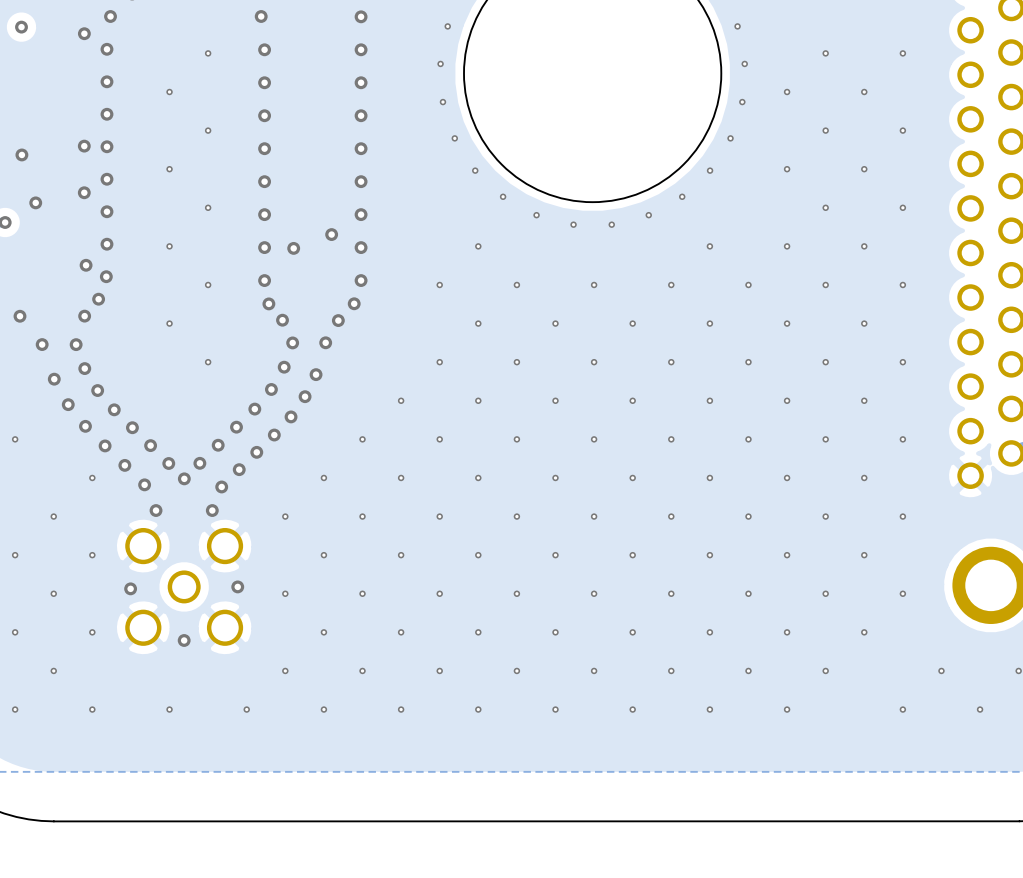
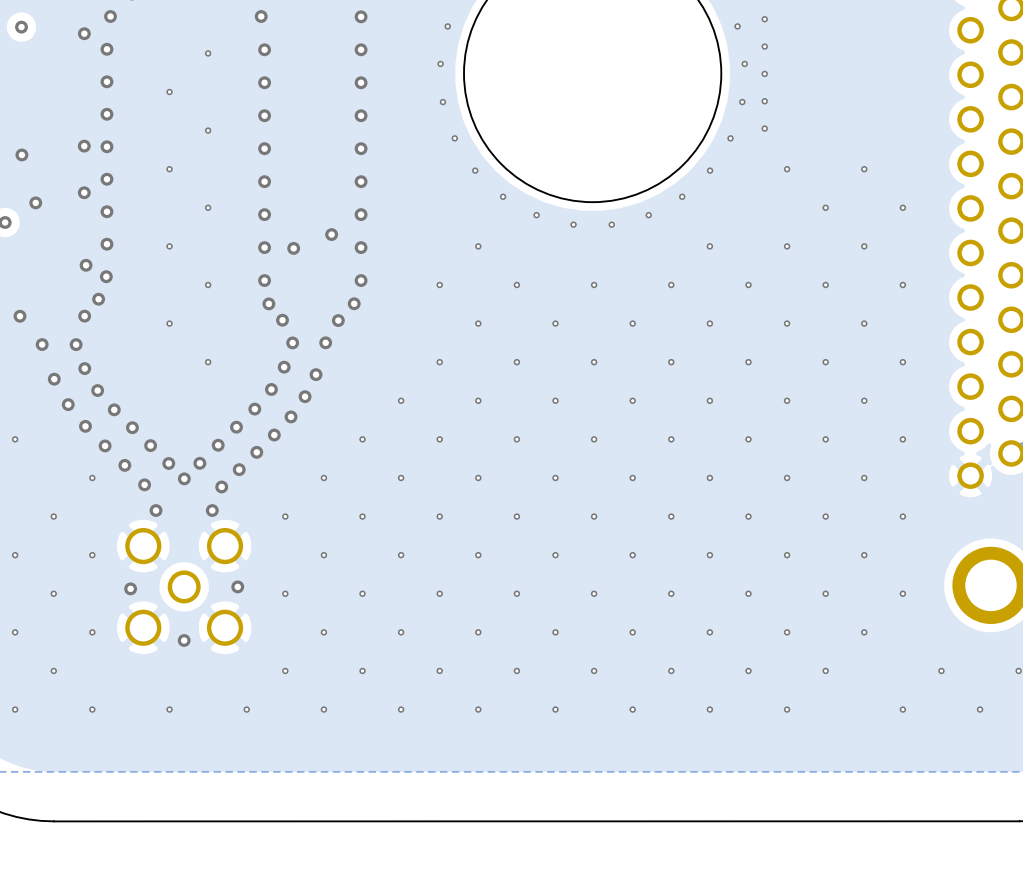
via: none -> (764, 19)
via: none -> (764, 46)
via: (825, 53) -> none
via: (902, 53) -> none
via: none -> (764, 73)
via: (787, 92) -> none
via: (864, 92) -> none
via: none -> (764, 101)
via: none -> (764, 128)
via: (825, 130) -> none
via: (902, 130) -> none

